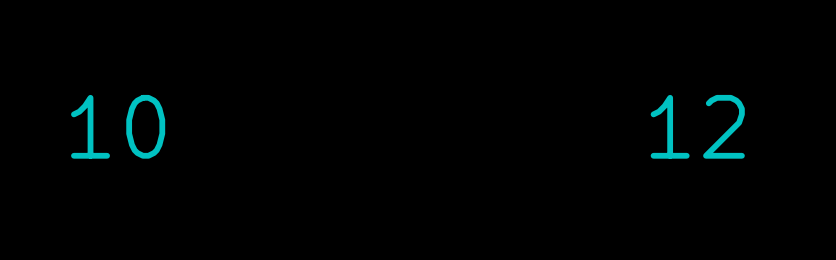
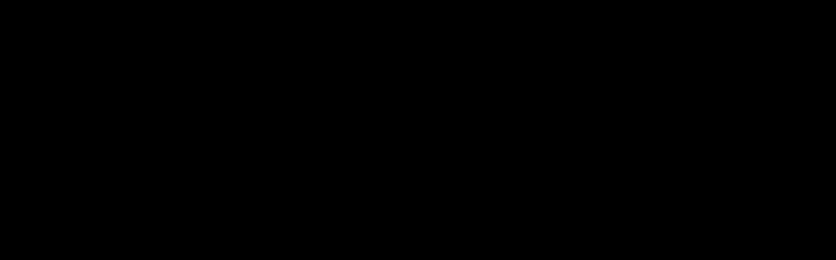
text: 10 (118, 126) -> none
text: 12 (697, 126) -> none

